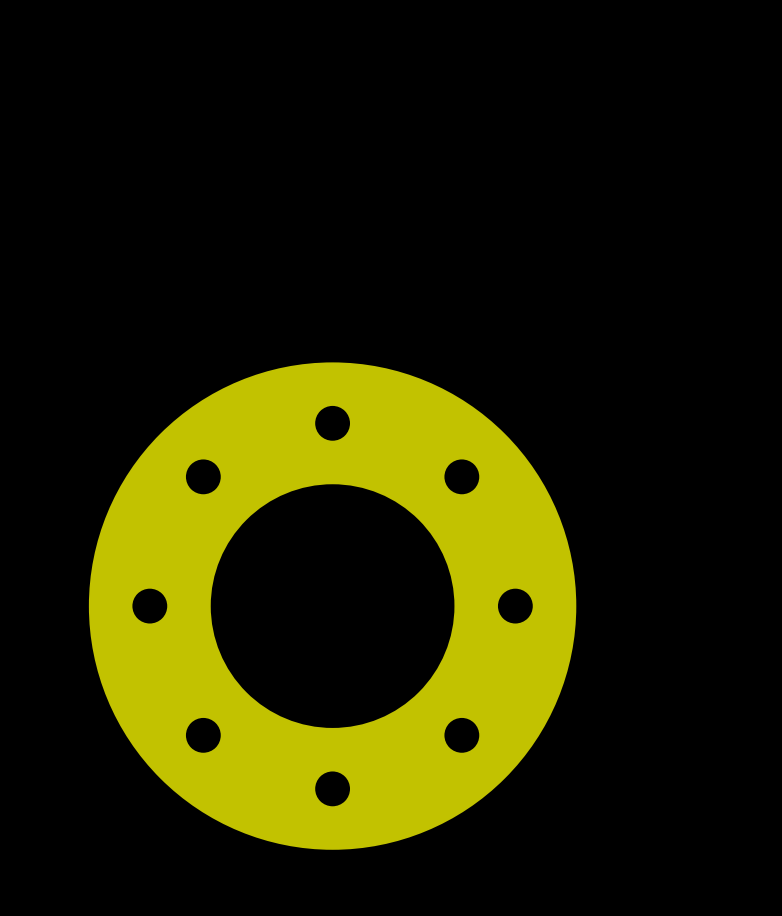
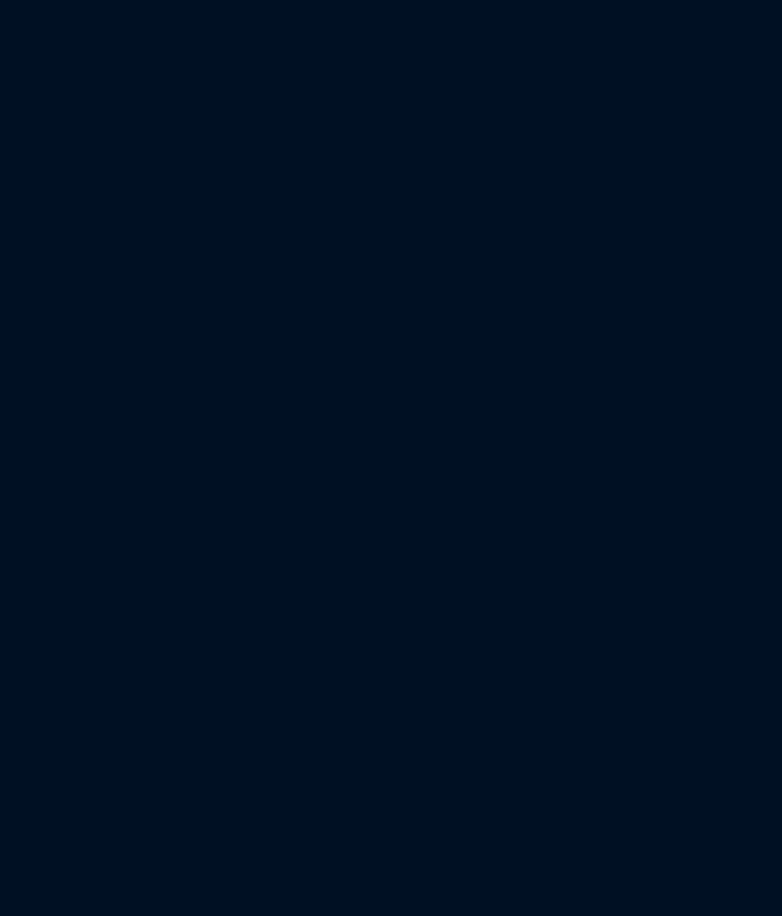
part: (332, 606) -> none

